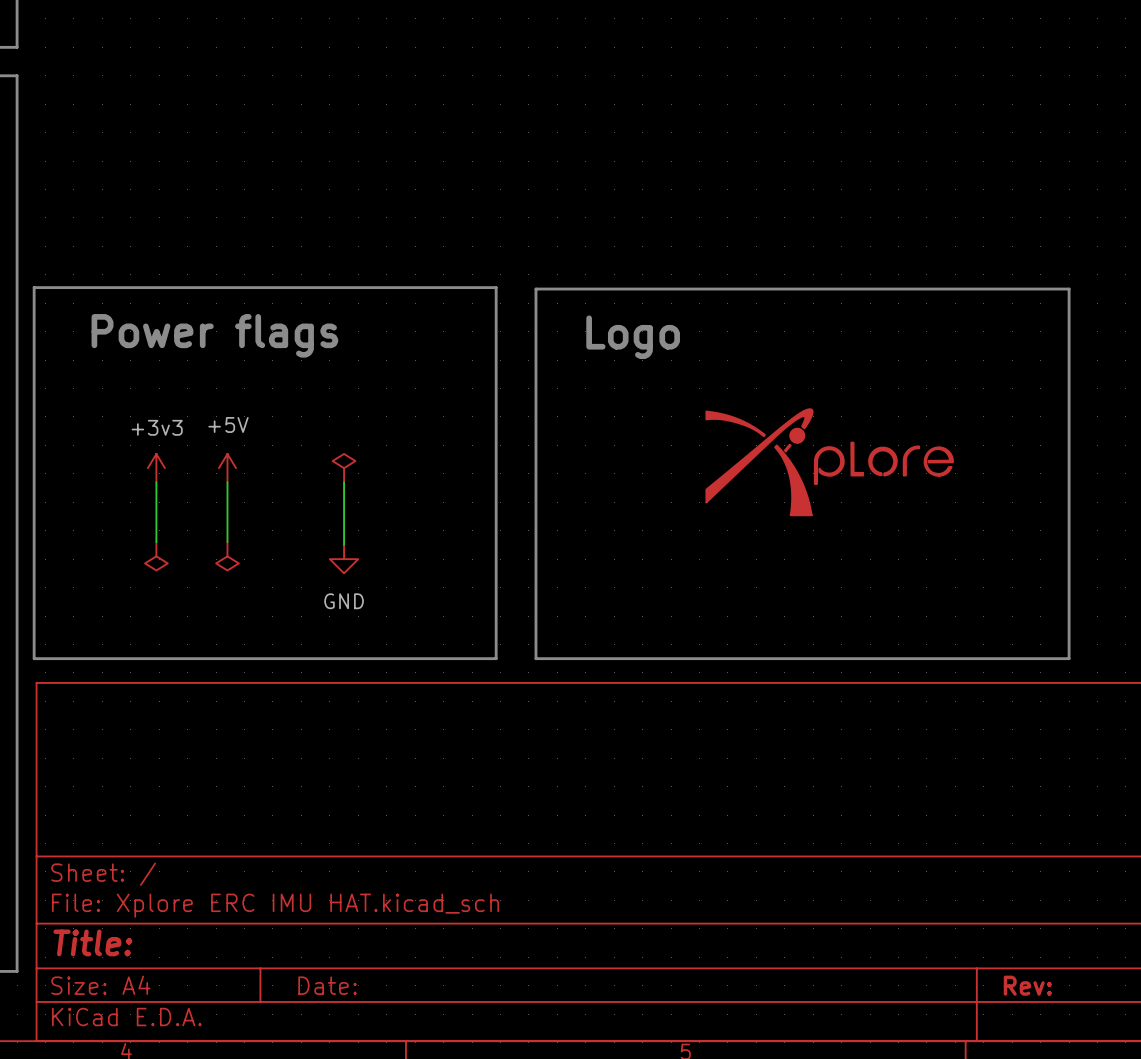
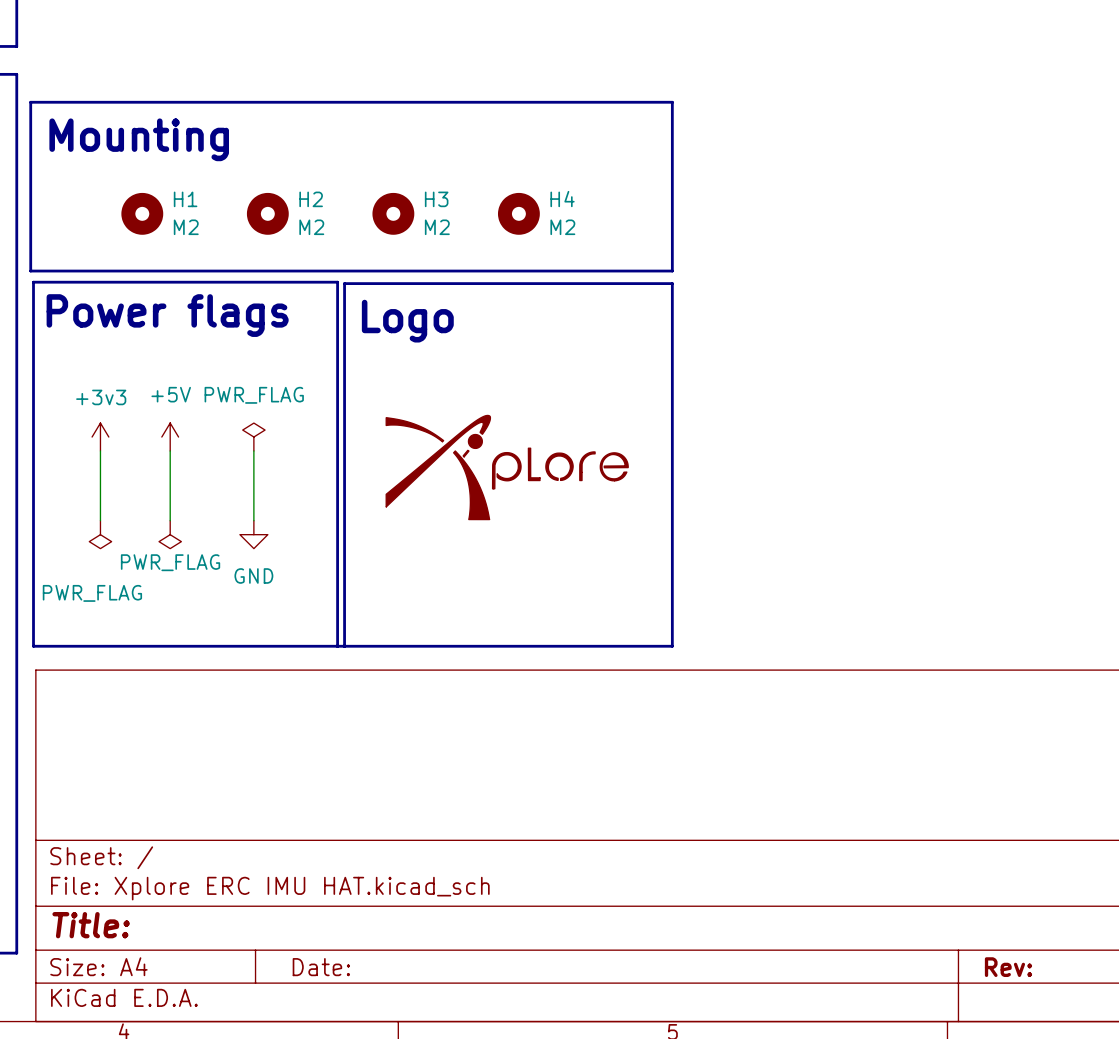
line: none -> (30, 102) (672, 102) (672, 271) (30, 271) (30, 102)
text: none -> Mounting (139, 139)
H1: none -> M2 (142, 213)
H2: none -> M2 (267, 213)
H3: none -> M2 (393, 213)
H4: none -> M2 (518, 213)
line: (344, 287) (496, 287) (496, 658) -> (337, 282) (337, 646)
line: (535, 289) (535, 658) -> (525, 283) (344, 283) (344, 646)
line: (685, 289) (1069, 289) (1069, 658) (685, 658) -> (672, 283) (672, 646)
text position: Power flags (214, 335) -> Power flags (167, 315)
text position: Logo (633, 337) -> Logo (407, 321)
power symbol: none -> PWR_FLAG (253, 437)
wire: none -> (100, 450) (100, 520)
wire: none -> (170, 450) (170, 520)
wire: none -> (253, 450) (253, 520)
part: (829, 462) -> none
power symbol position: +3v3 (156, 468) -> +3v3 (100, 437)
power symbol position: +5V (227, 468) -> +5V (170, 437)
power symbol: (344, 468) -> none
part: none -> (507, 467)
wire: (156, 482) (156, 542) -> none
wire: (227, 482) (227, 542) -> none
power symbol: none -> PWR_FLAG (100, 534)
power symbol: none -> PWR_FLAG (170, 534)
power symbol: (156, 556) -> none
power symbol: (227, 556) -> none
power symbol position: GND (344, 559) -> GND (253, 534)
line: none -> (486, 646) (525, 646)

